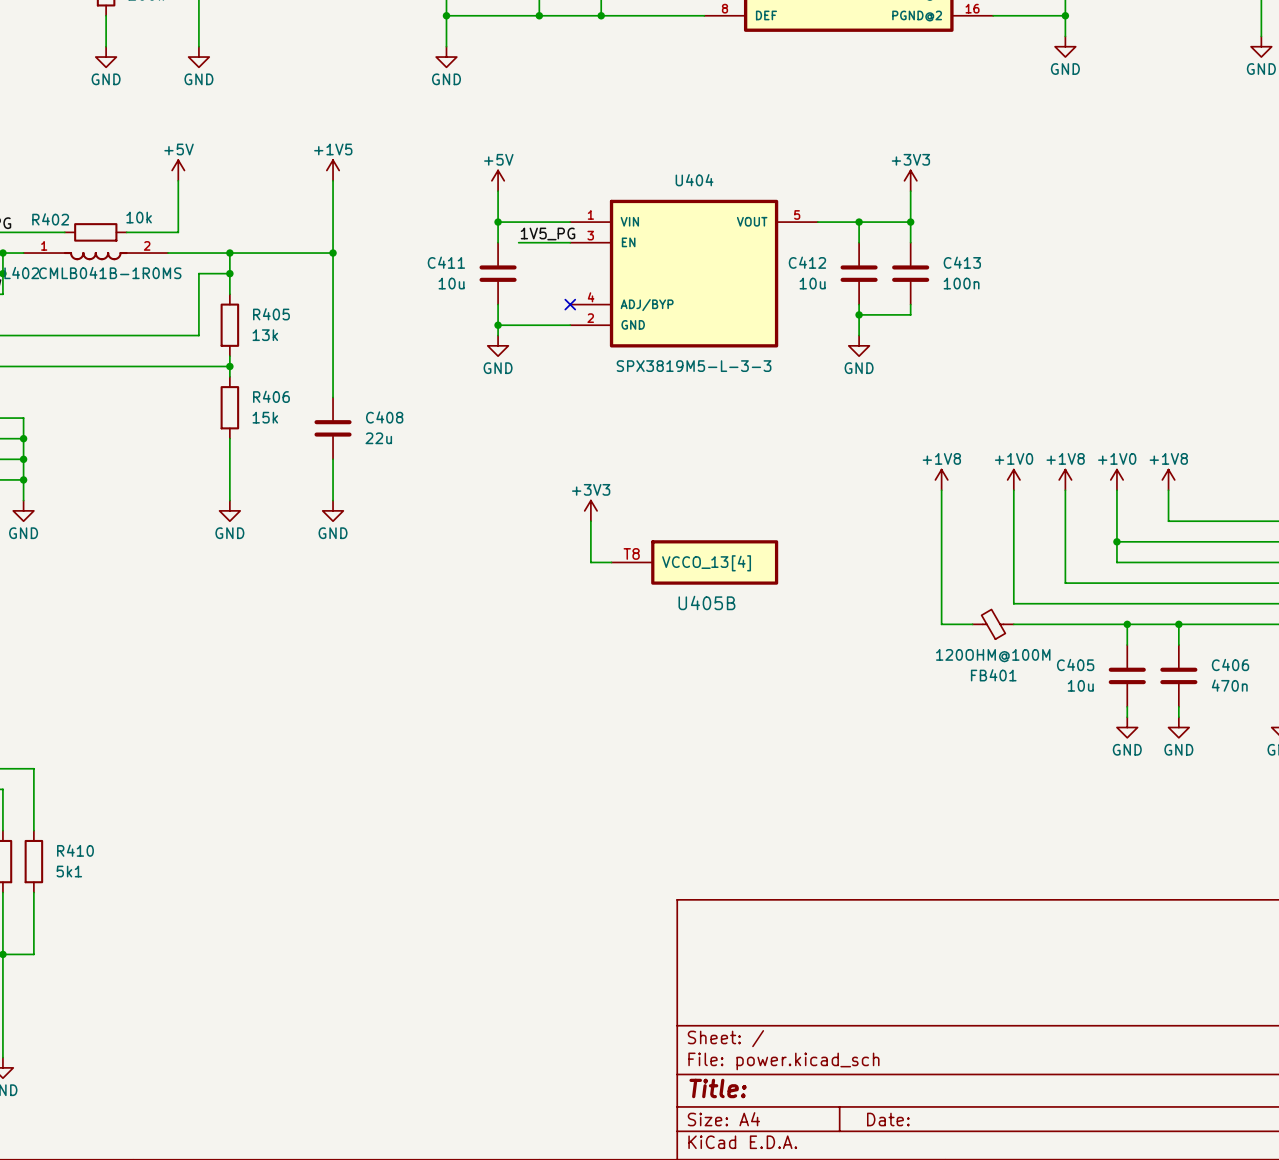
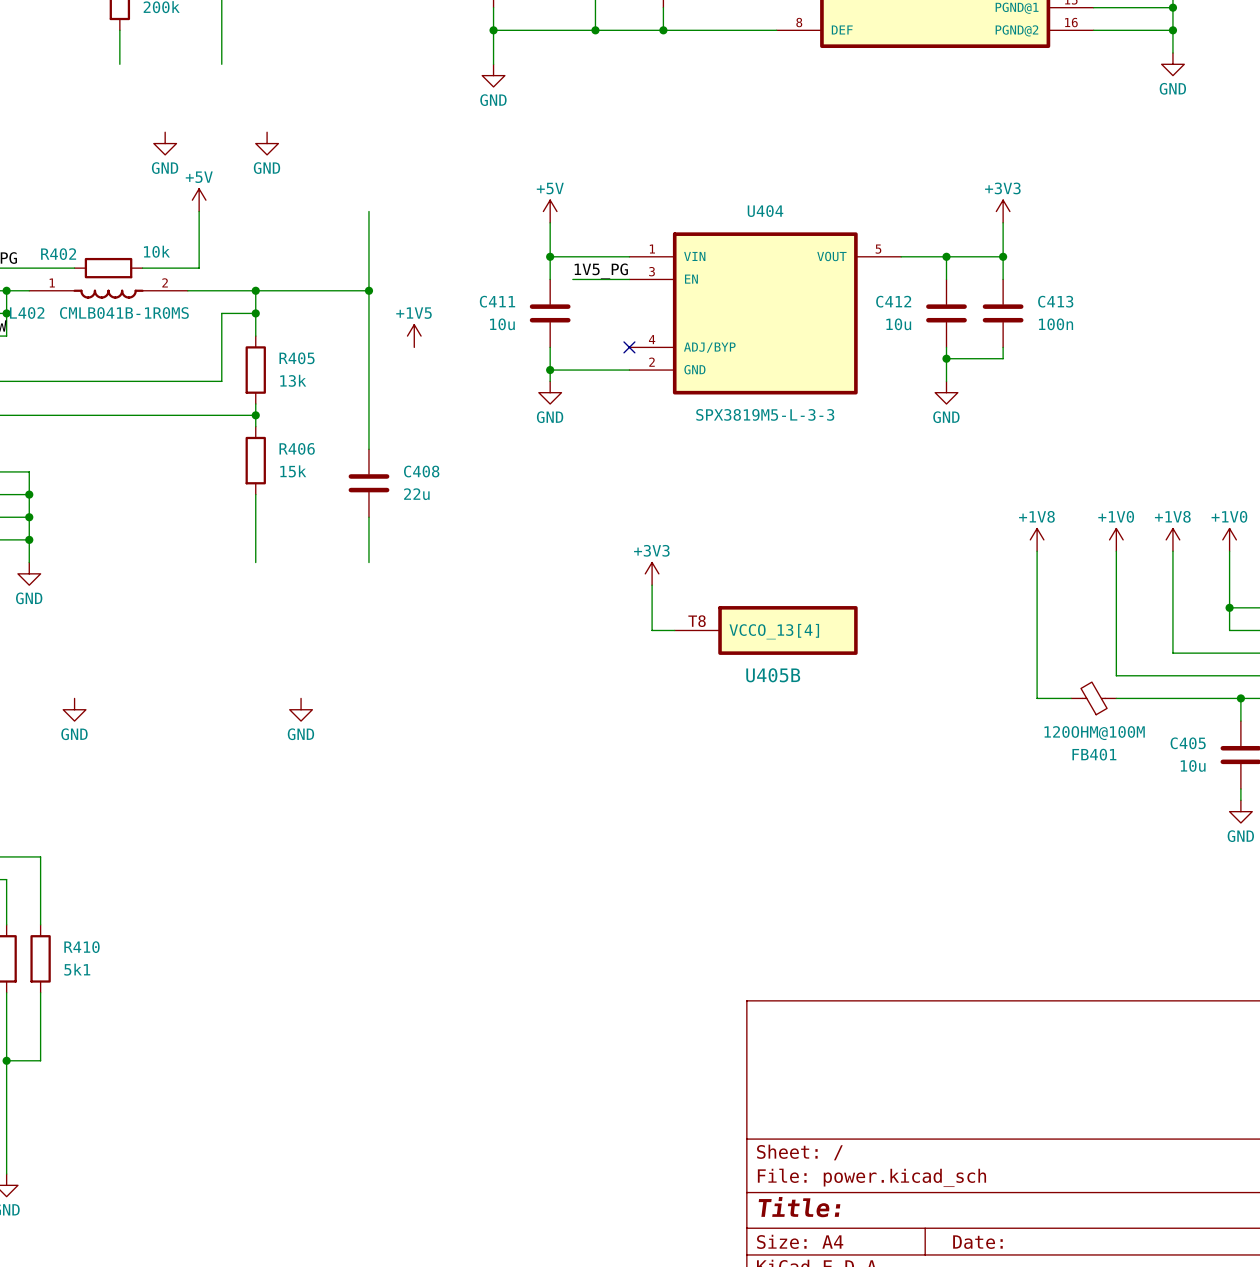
power symbol: GND (106, 57) -> none
power symbol: GND (198, 57) -> none
power symbol: none -> GND (165, 143)
power symbol: none -> GND (267, 143)
power symbol position: +1V5 (333, 170) -> +1V5 (414, 336)
power symbol: GND (229, 510) -> none
power symbol: GND (333, 510) -> none
power symbol: none -> GND (74, 709)
power symbol: none -> GND (301, 709)

